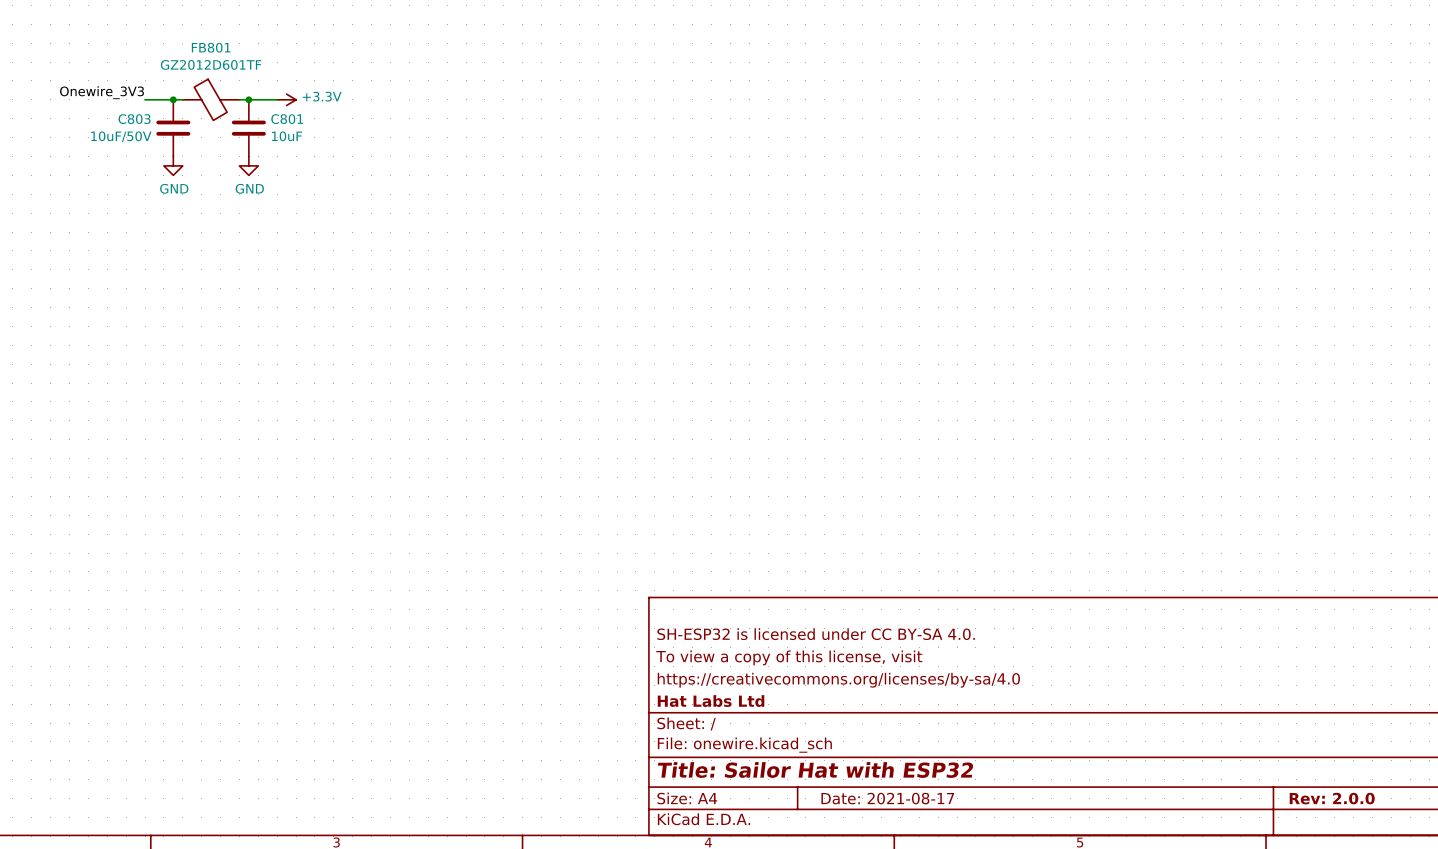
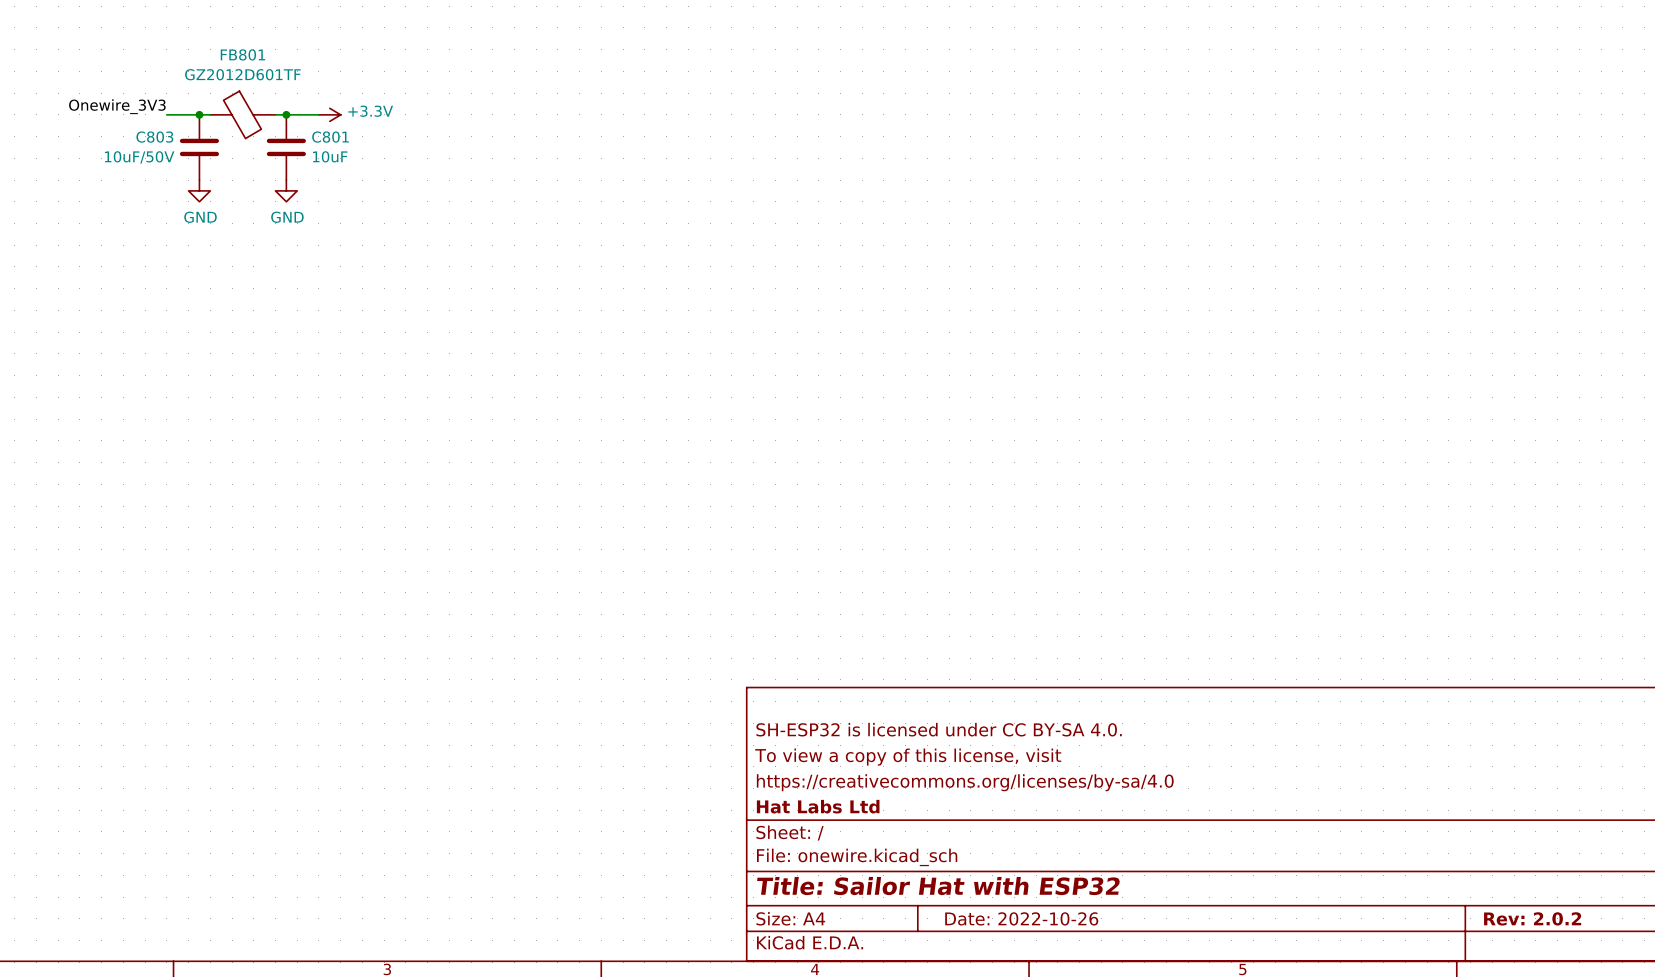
title block: Date: 2021-08-17 (887, 798) -> Date: 2022-10-26 (1021, 918)
title block: Rev: 2.0.0 (1332, 798) -> Rev: 2.0.2 (1532, 918)

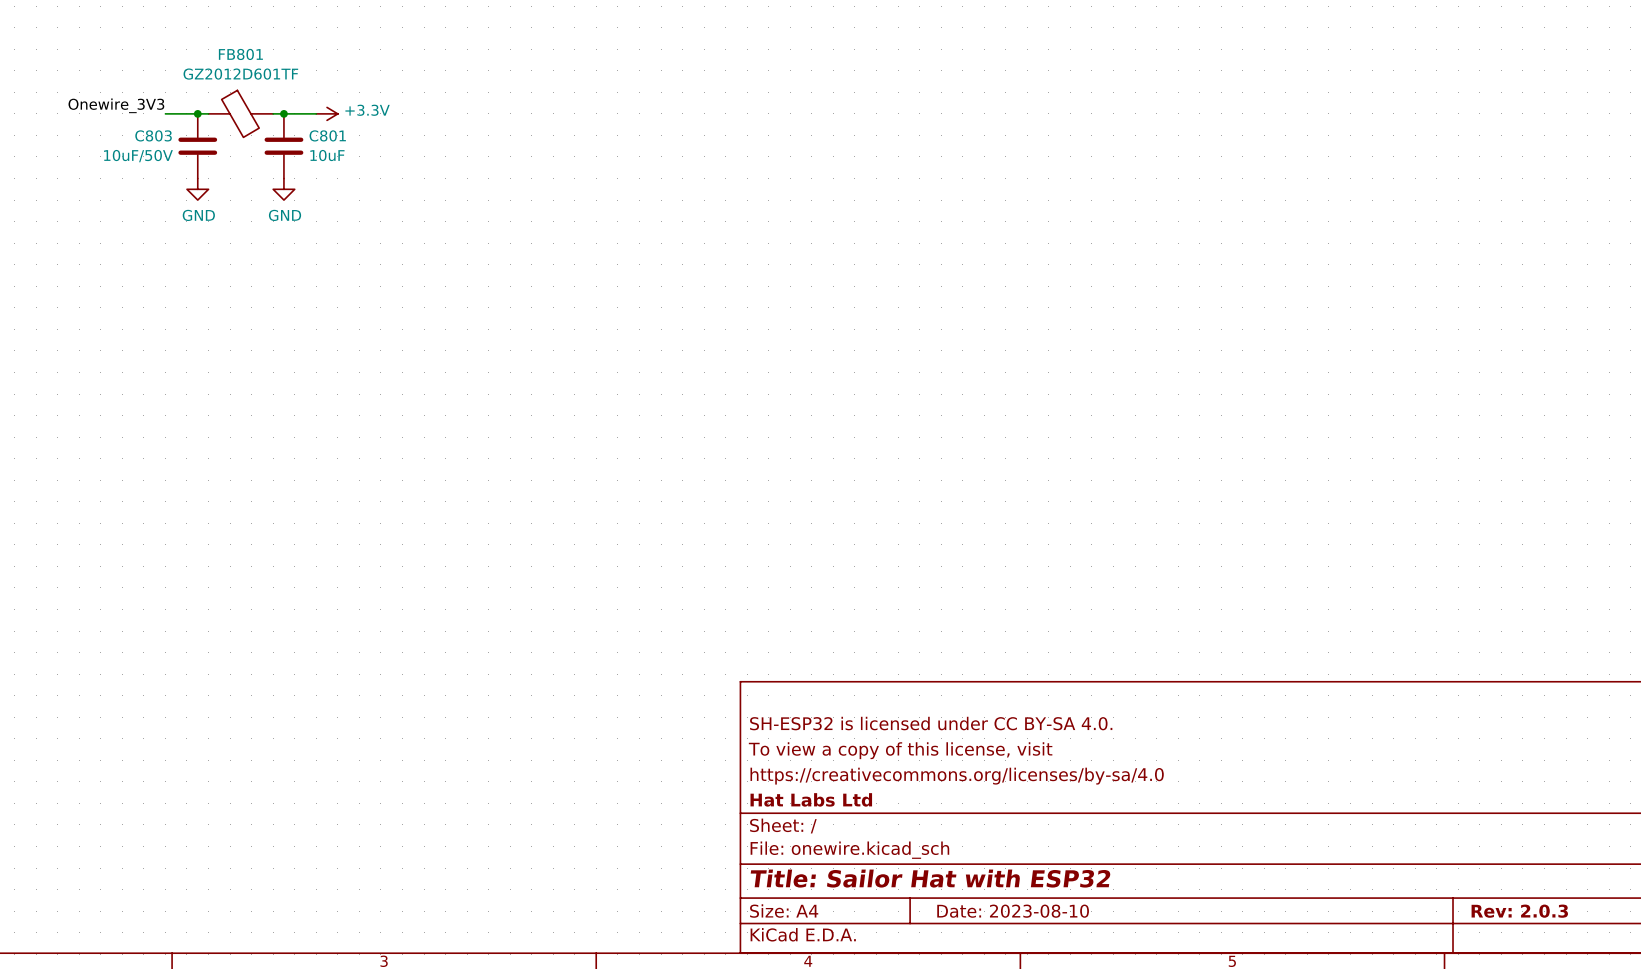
title block: Date: 2022-10-26 (1021, 918) -> Date: 2023-08-10 (1013, 911)
title block: Rev: 2.0.2 (1532, 918) -> Rev: 2.0.3 (1519, 911)

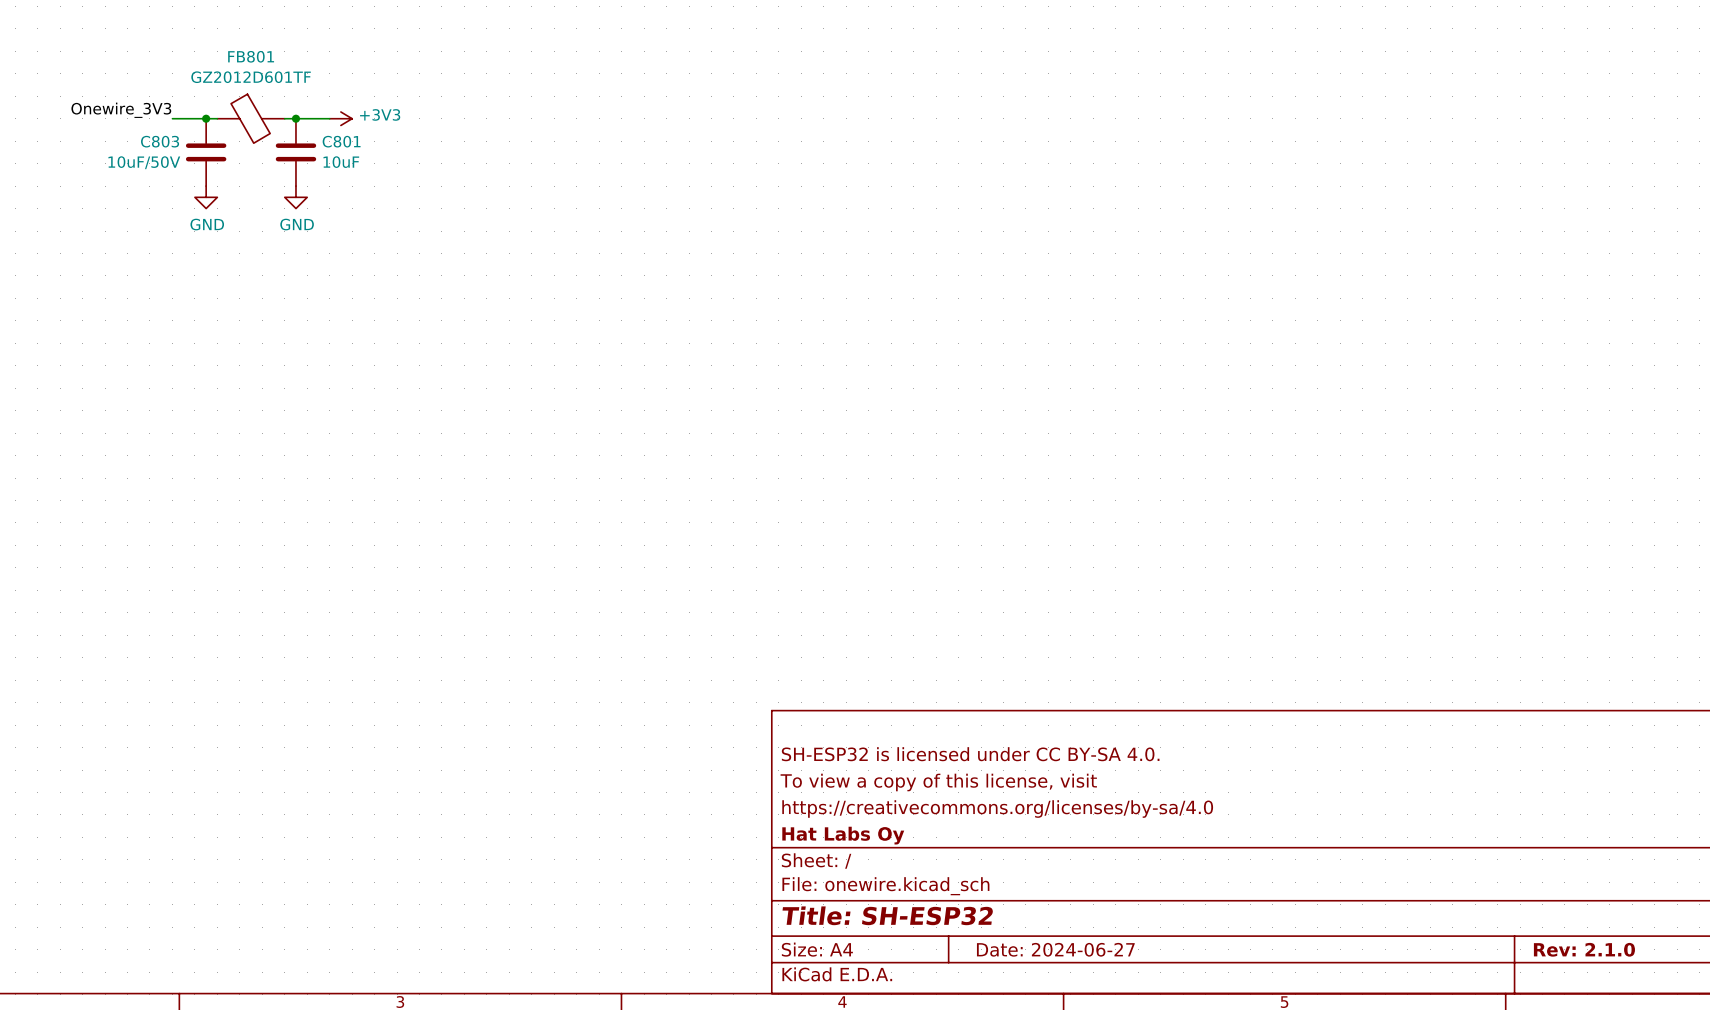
power symbol: +3.3V (327, 113) -> +3V3 (340, 118)
title block: Hat Labs Ltd (811, 799) -> Hat Labs Oy (843, 835)
title block: Title: Sailor Hat with ESP32 (930, 878) -> Title: SH-ESP32 (887, 915)
title block: Date: 2023-08-10 (1013, 911) -> Date: 2024-06-27 (1055, 949)
title block: Rev: 2.0.3 (1519, 911) -> Rev: 2.1.0 (1584, 949)

